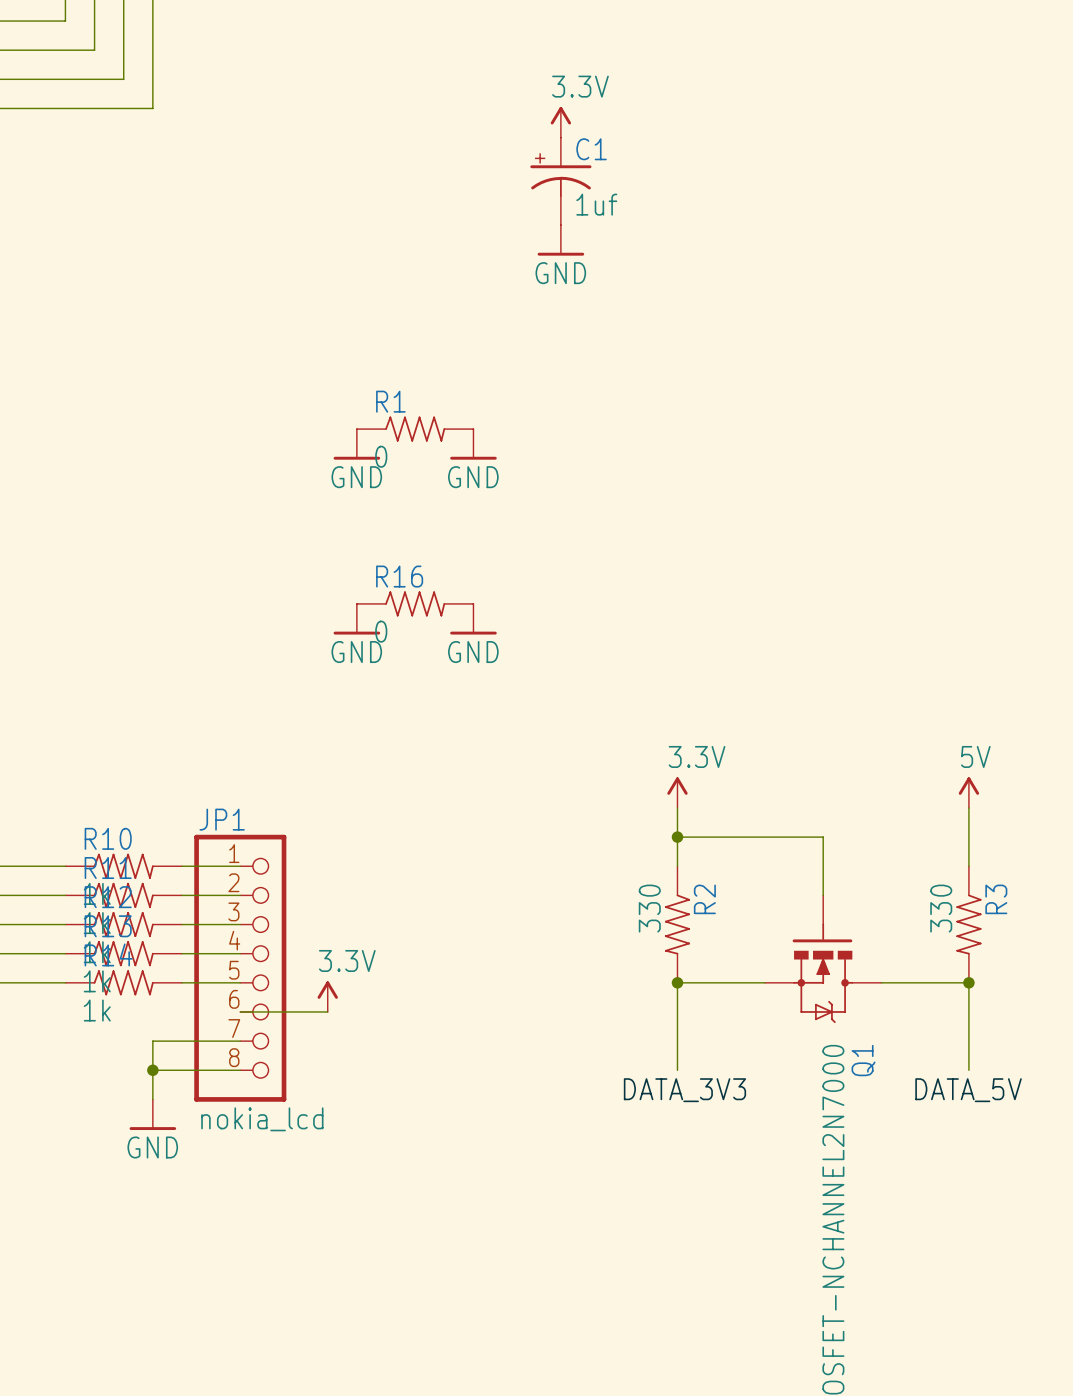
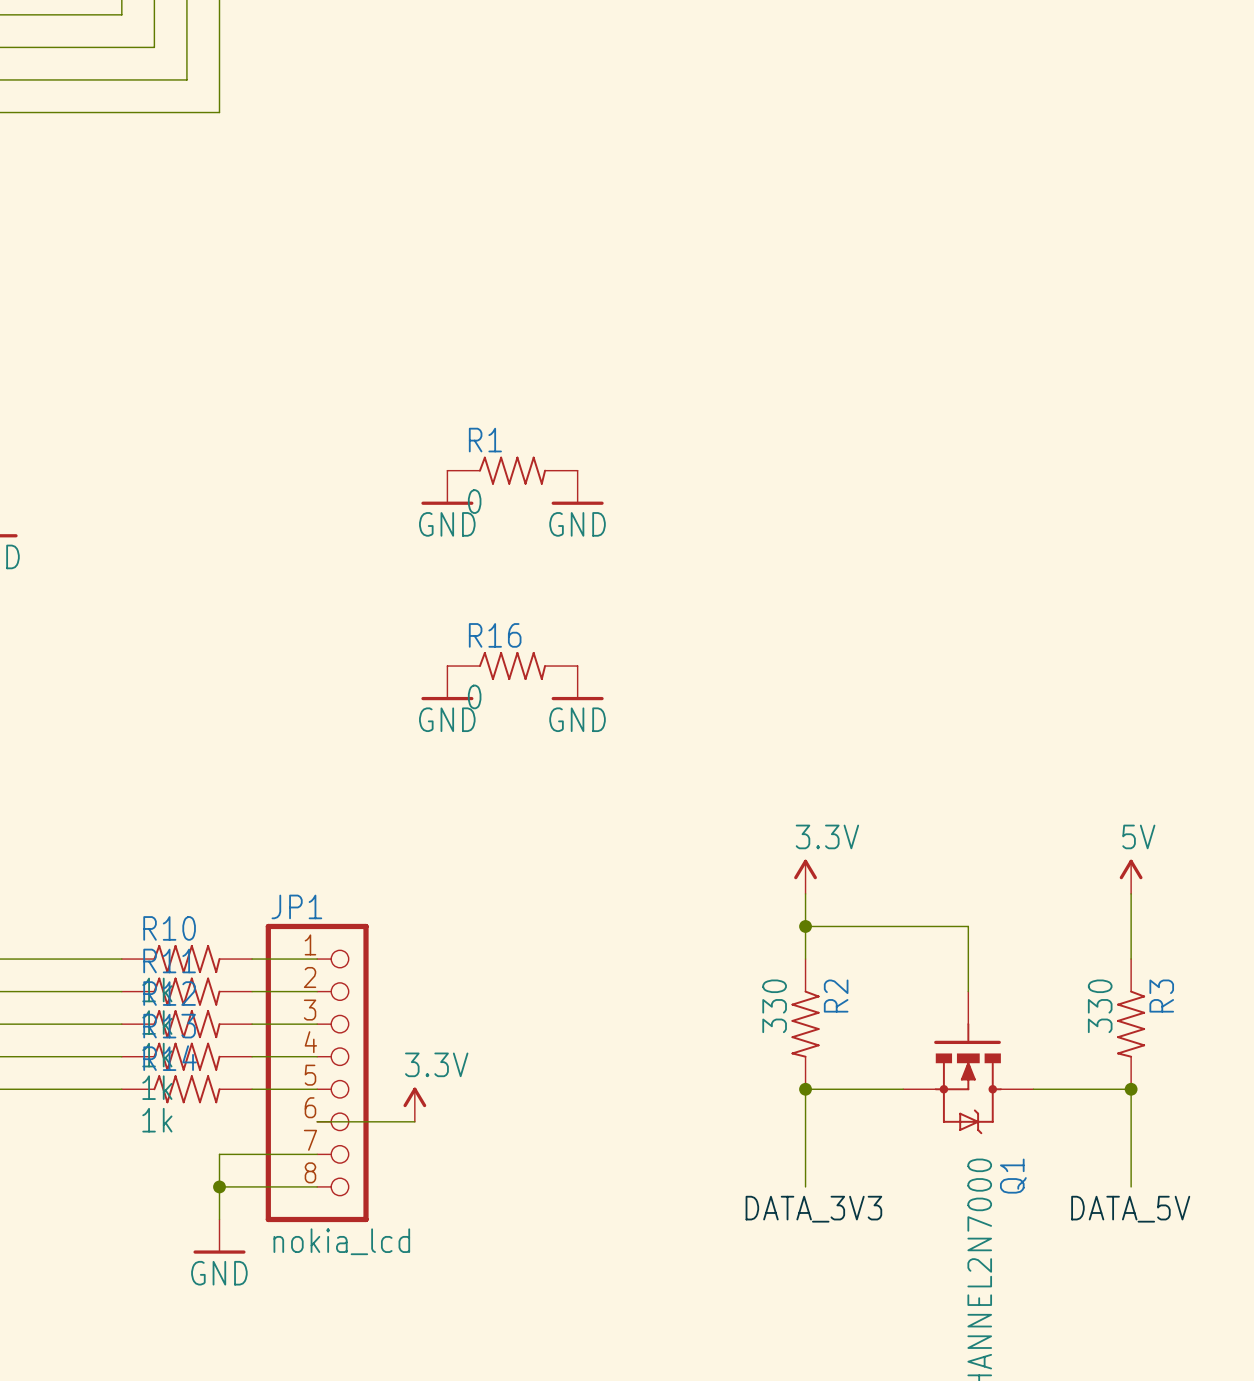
power symbol: 3.3V (560, 122) -> none
C1: 1uf (560, 181) -> none
power symbol: GND (560, 240) -> none

